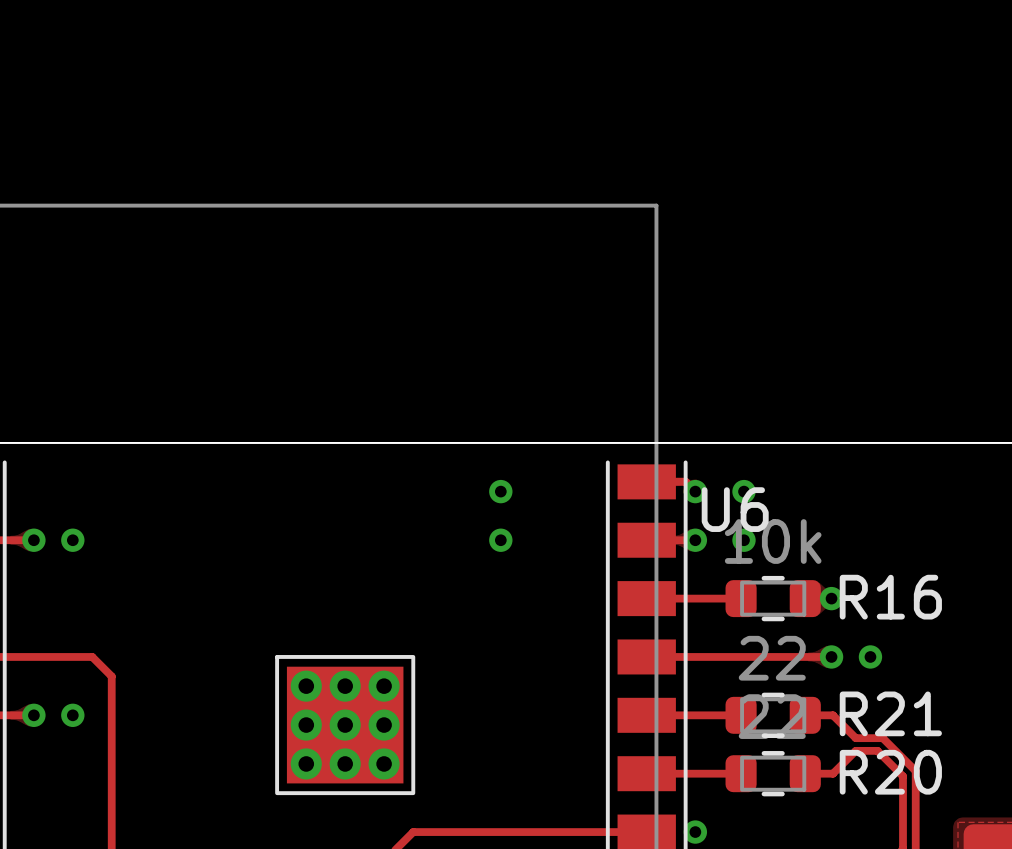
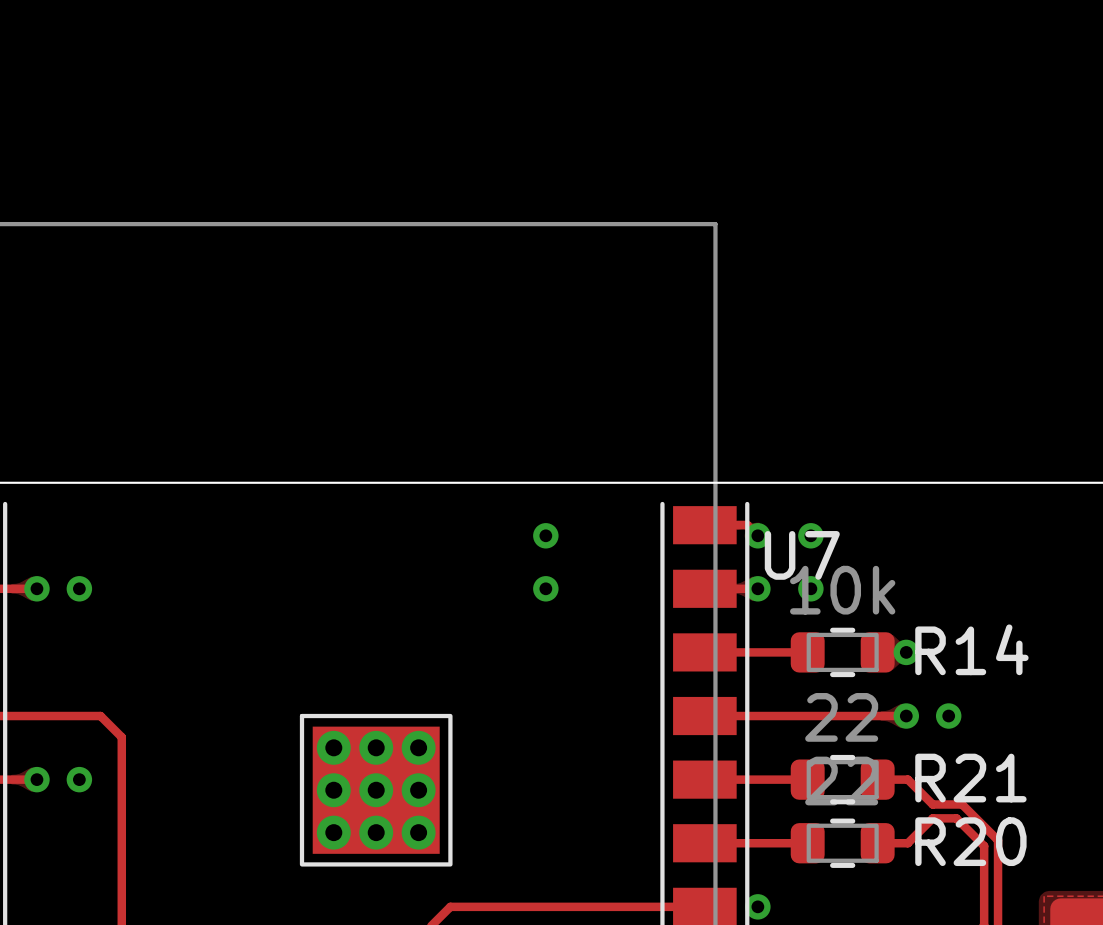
U6 name: U6 (735, 509) -> U7 (802, 555)
R16 name: R16 (890, 597) -> R14 (971, 649)

